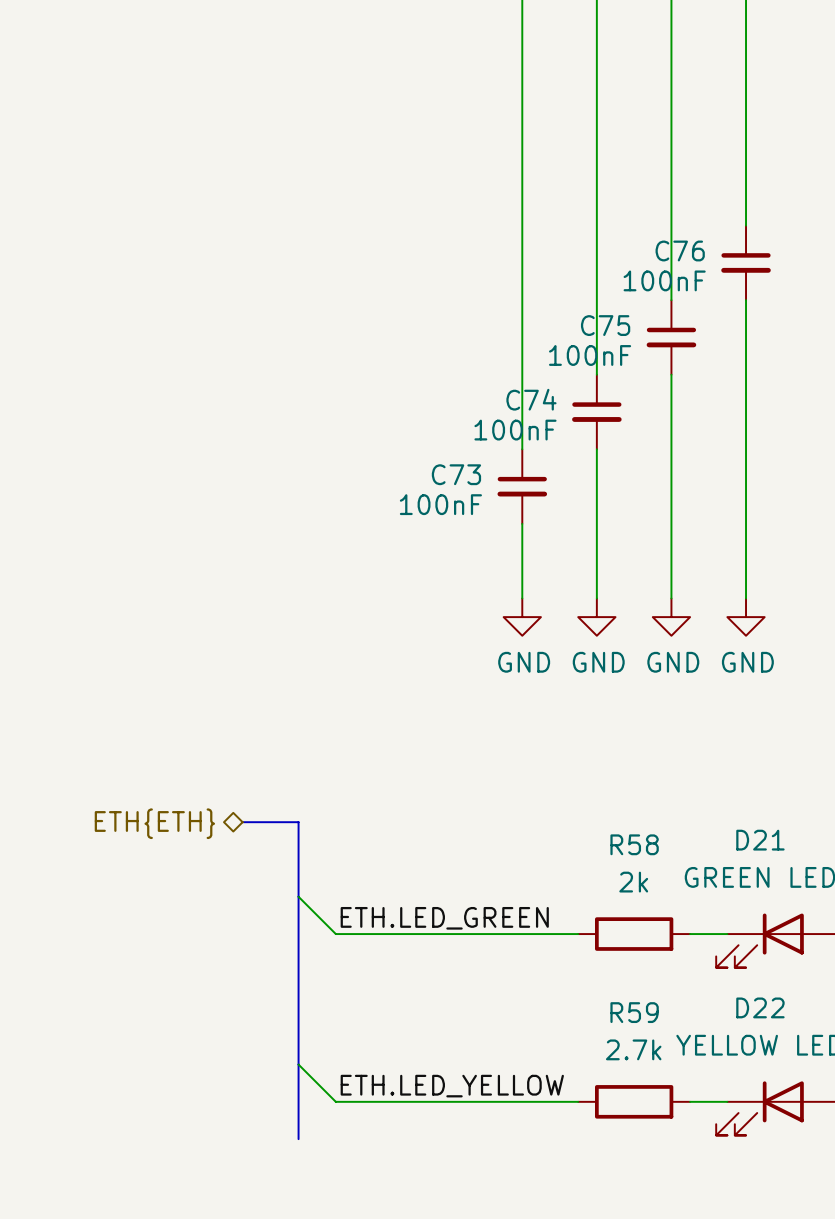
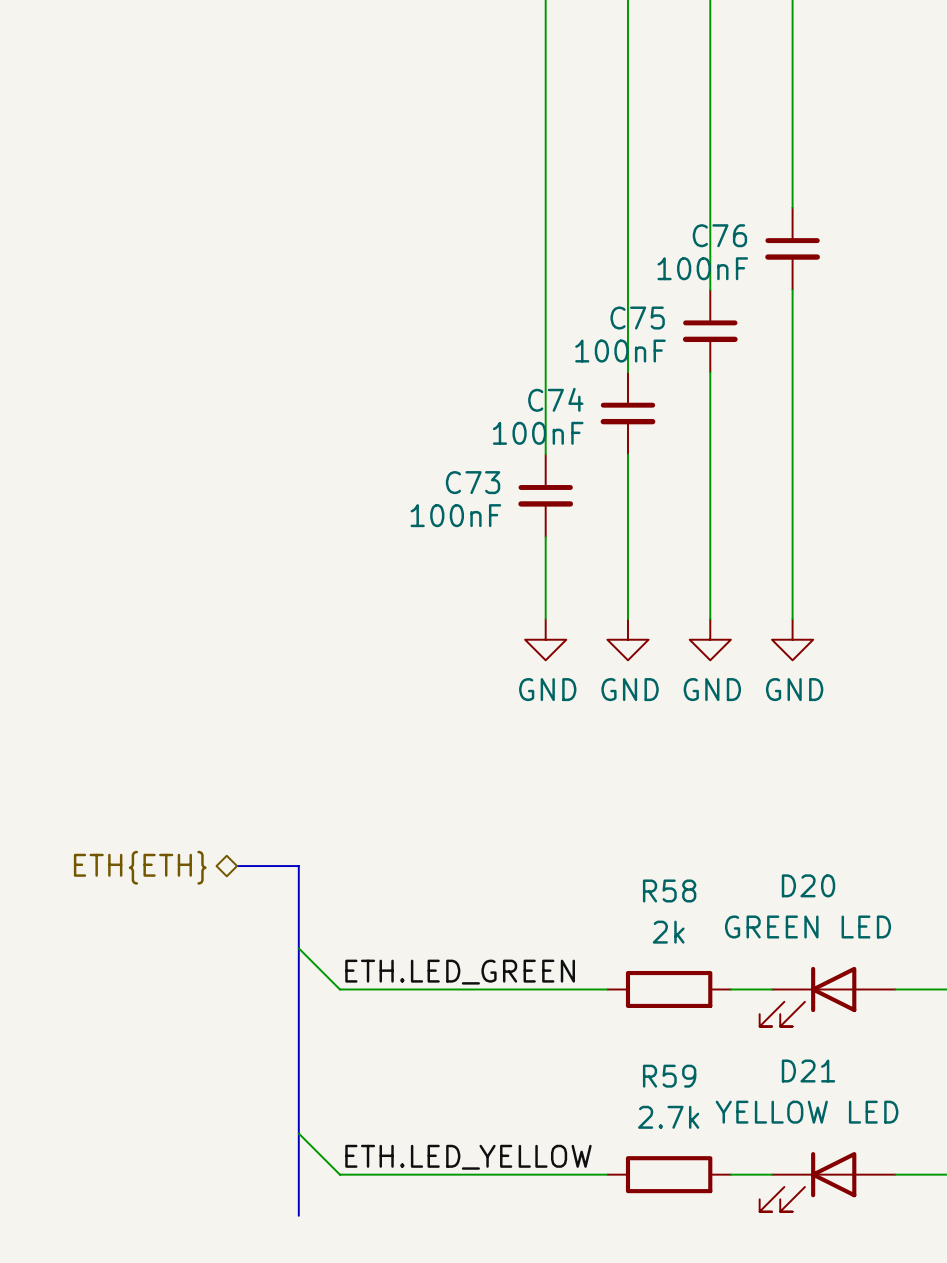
D21 name: D21 (760, 840) -> D20 (808, 885)
D22 name: D22 (760, 1007) -> D21 (808, 1071)

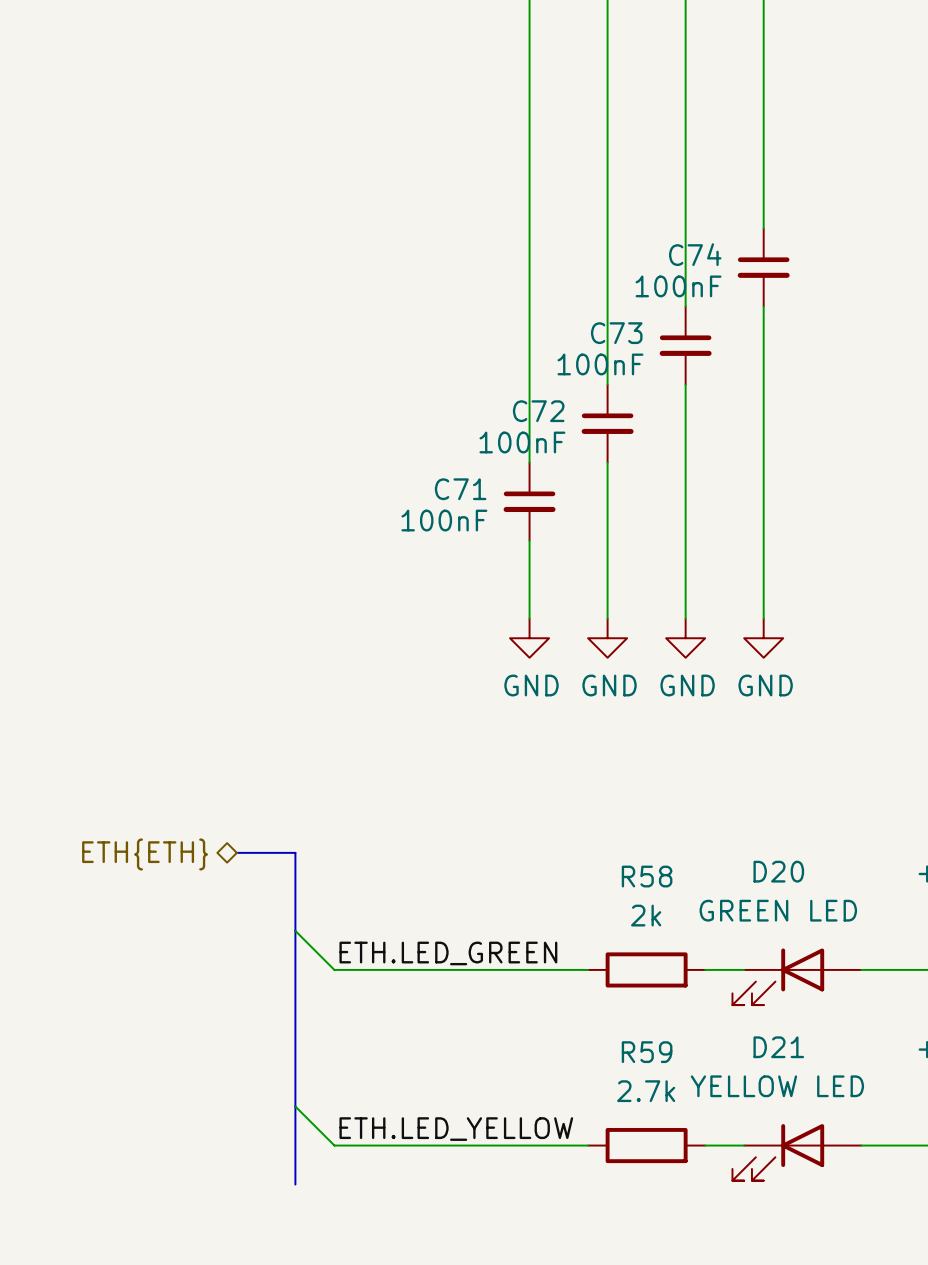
C76 name: C76 (719, 235) -> C74 (695, 254)
C75 name: C75 (637, 318) -> C73 (616, 333)
C74 name: C74 (555, 399) -> C72 (538, 411)
C73 name: C73 (473, 482) -> C71 (460, 489)

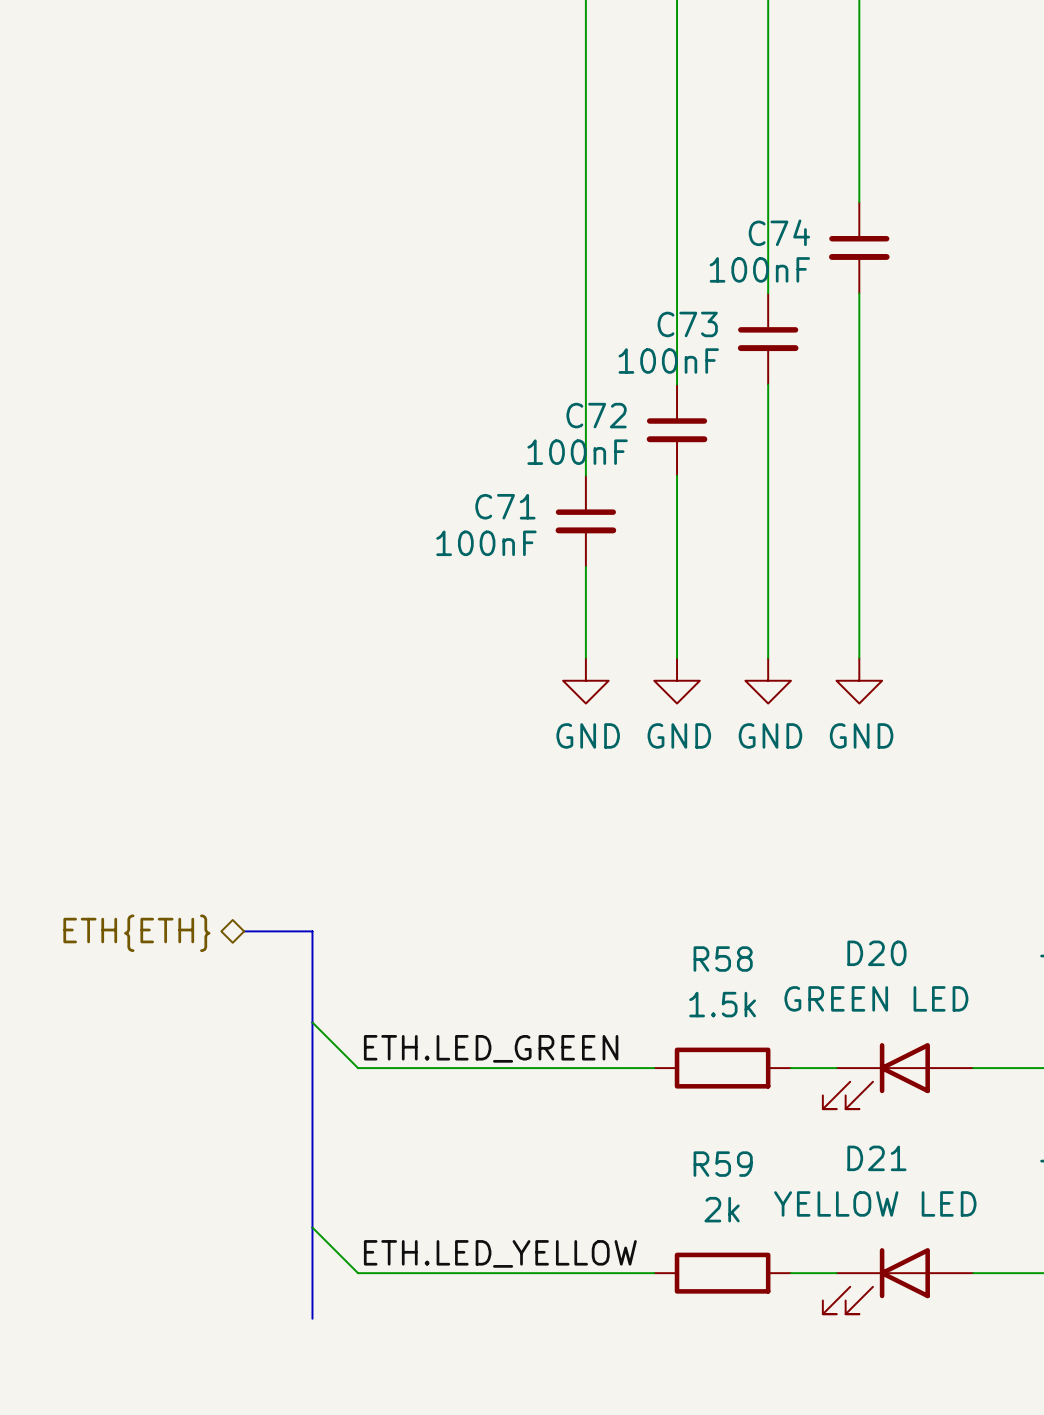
R58 value: 2k (646, 915) -> 1.5k (722, 1004)
R59 value: 2.7k (646, 1091) -> 2k (722, 1209)

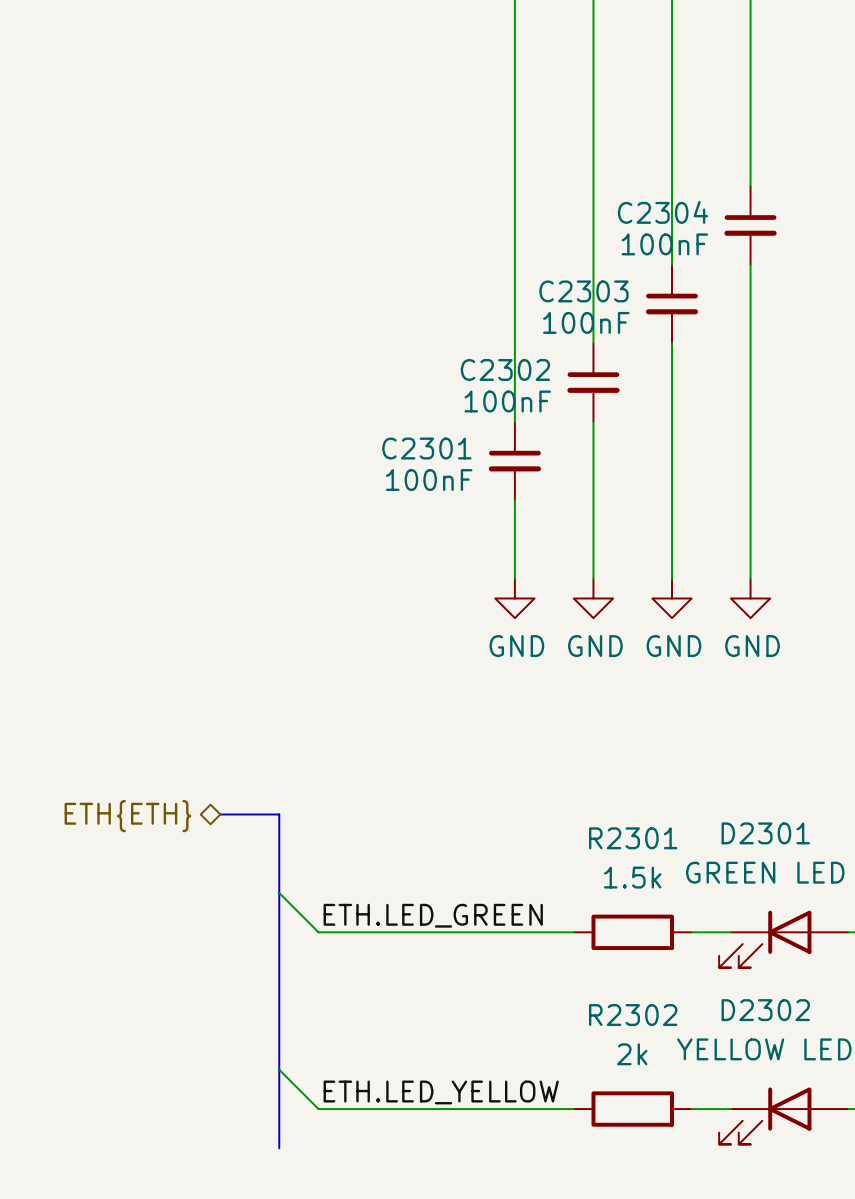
C74 name: C74 (779, 232) -> C2304 (662, 212)
C73 name: C73 (687, 324) -> C2303 (583, 291)
C72 name: C72 (596, 415) -> C2302 (505, 369)
C71 name: C71 (505, 506) -> C2301 (426, 448)
D20 name: D20 (876, 953) -> D2301 (765, 833)
R58 name: R58 (723, 959) -> R2301 (633, 838)
D21 name: D21 (876, 1158) -> D2302 (765, 1010)
R59 name: R59 (723, 1164) -> R2302 (633, 1015)

